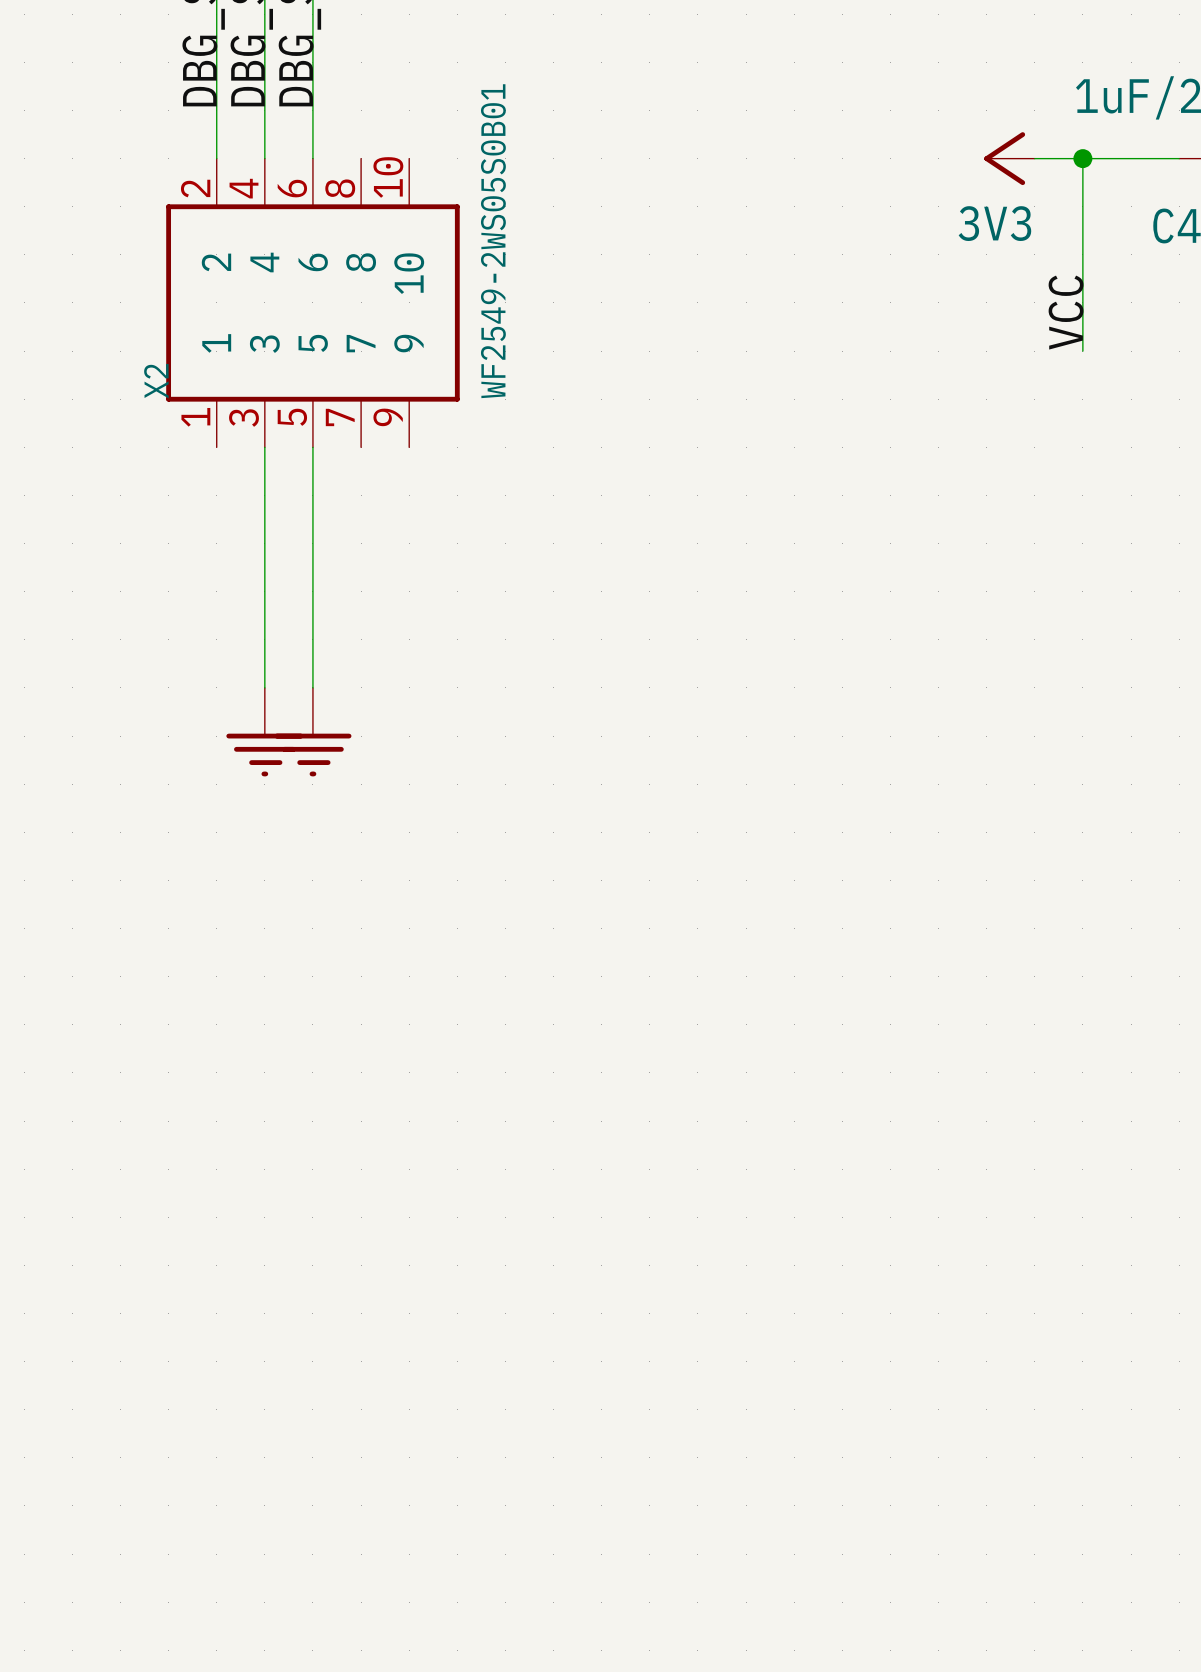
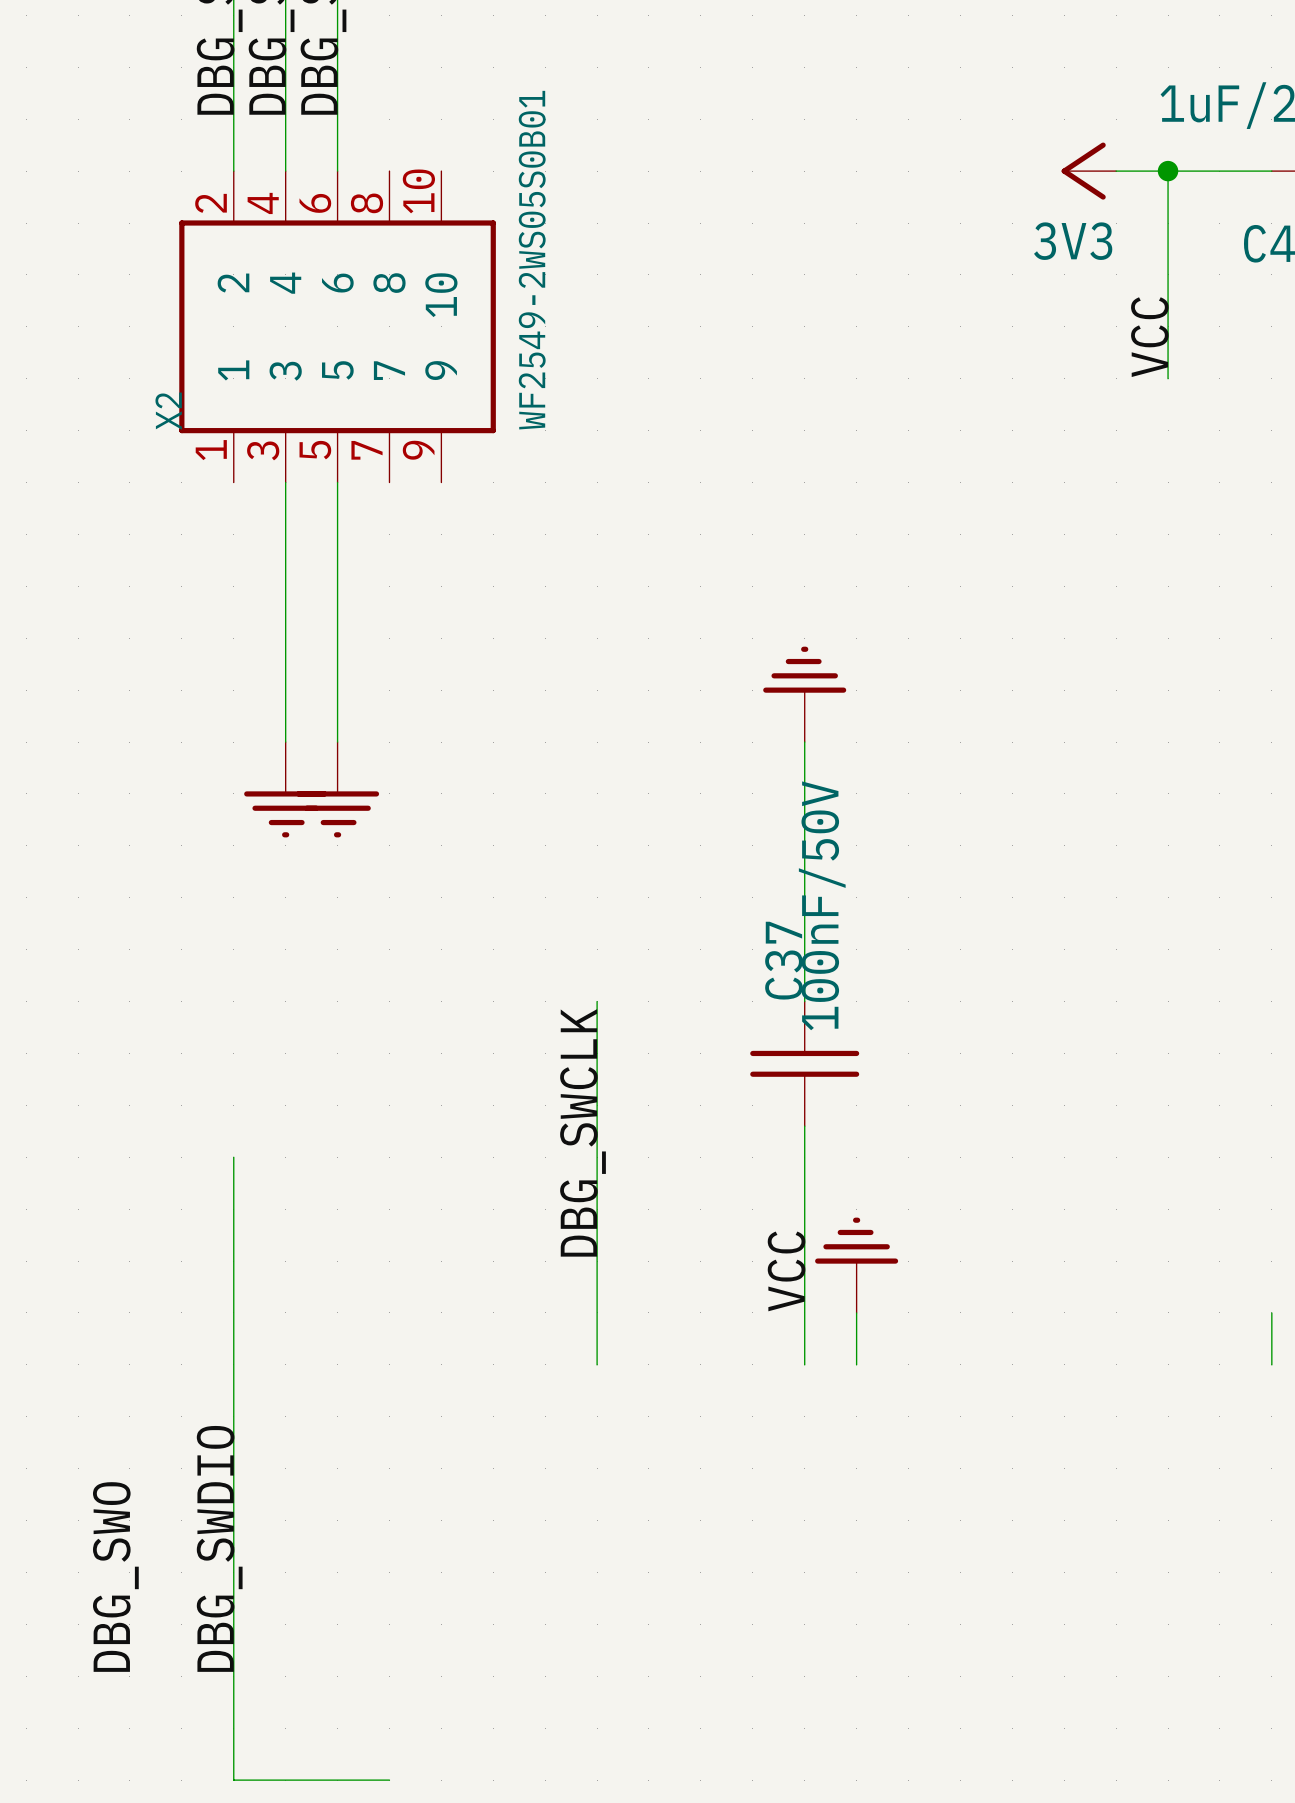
power symbol: none -> (804, 694)
wire: none -> (804, 742) (804, 1001)
wire: none -> (597, 1001) (597, 1364)
C37: none -> 100nF/50V (804, 1063)
wire: none -> (804, 1126) (804, 1364)
label: none -> DBG_SWCLK (583, 1132)
wire: none -> (233, 1157) (233, 1780) (389, 1780)
power symbol: none -> (856, 1265)
label: none -> VCC (786, 1271)
wire: none -> (856, 1312) (856, 1364)
wire: none -> (1271, 1312) (1271, 1364)
label: none -> DBG_SWDIO (219, 1548)
label: none -> DBG_SWO (115, 1577)

